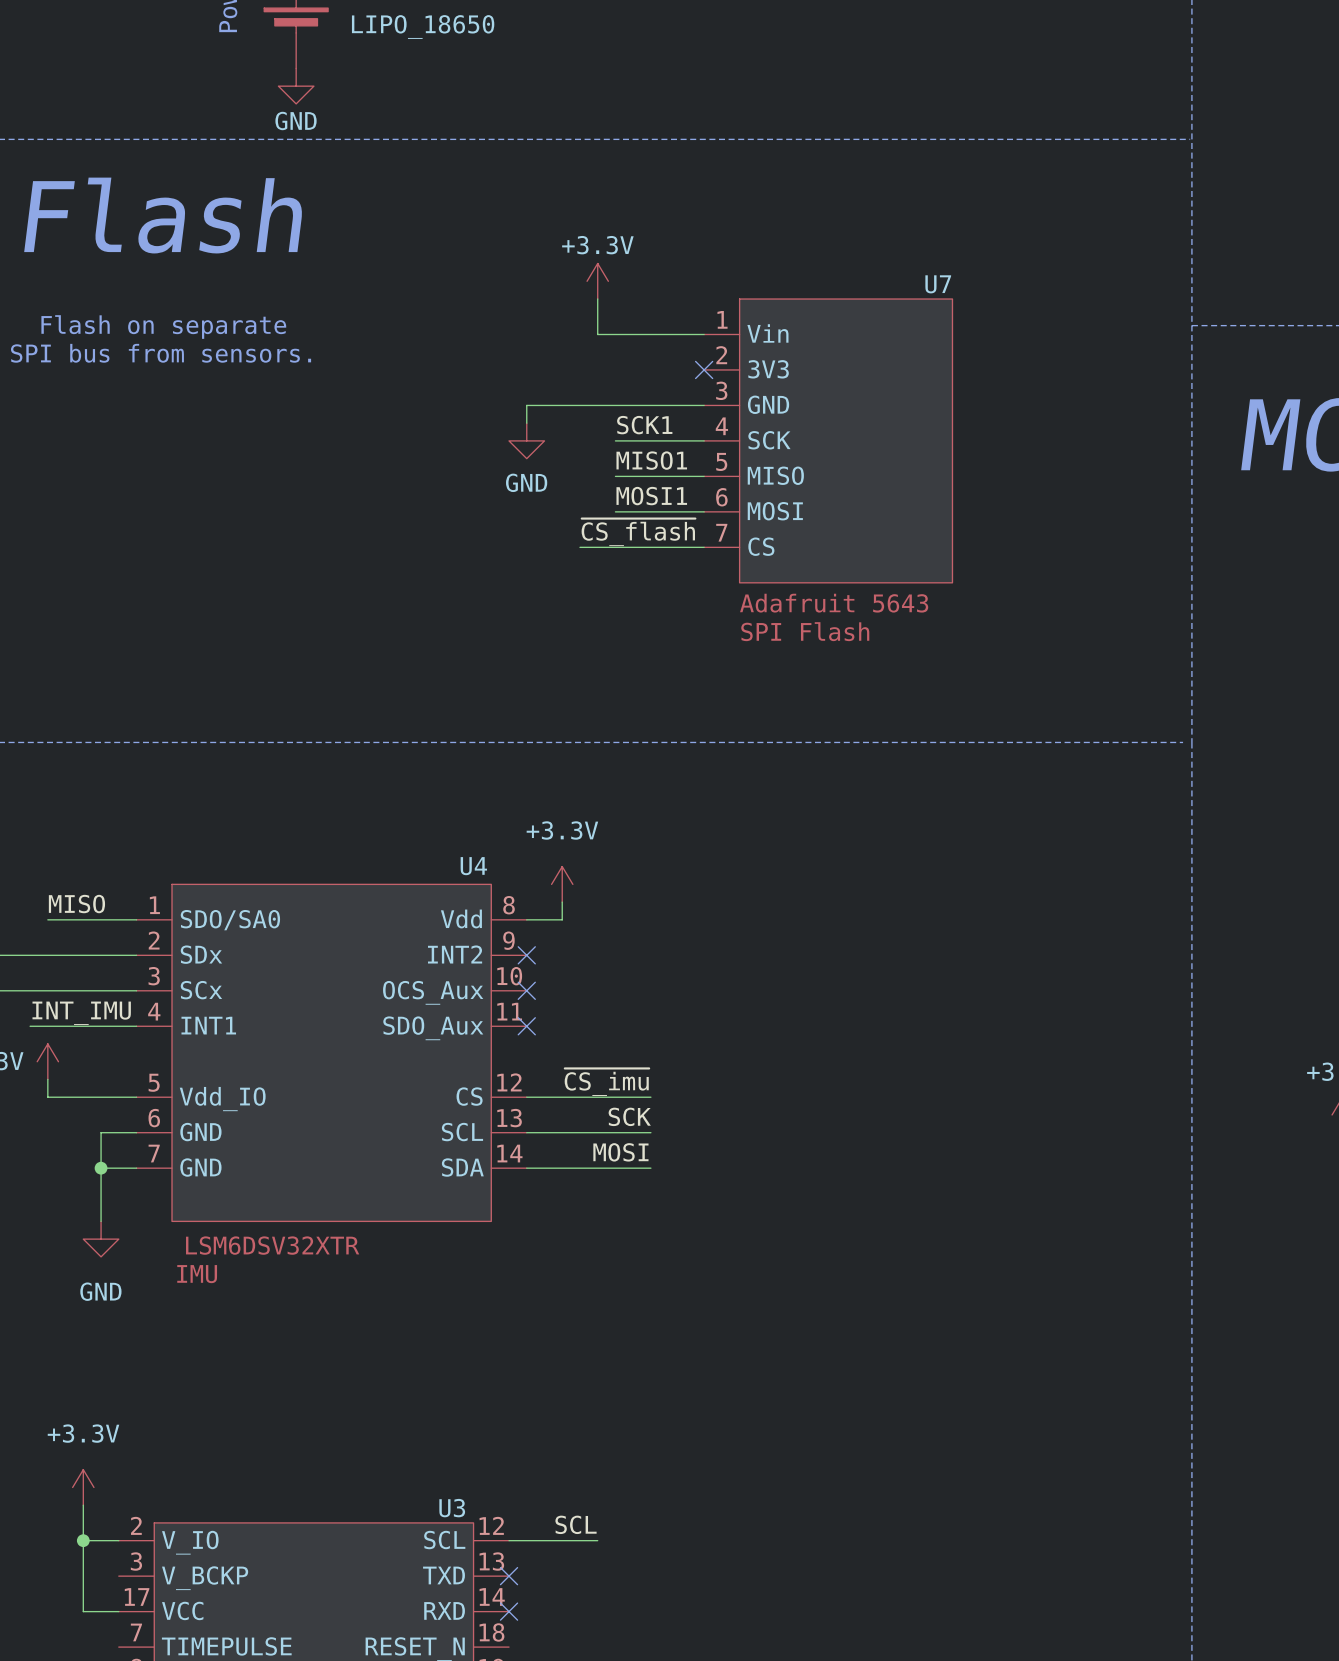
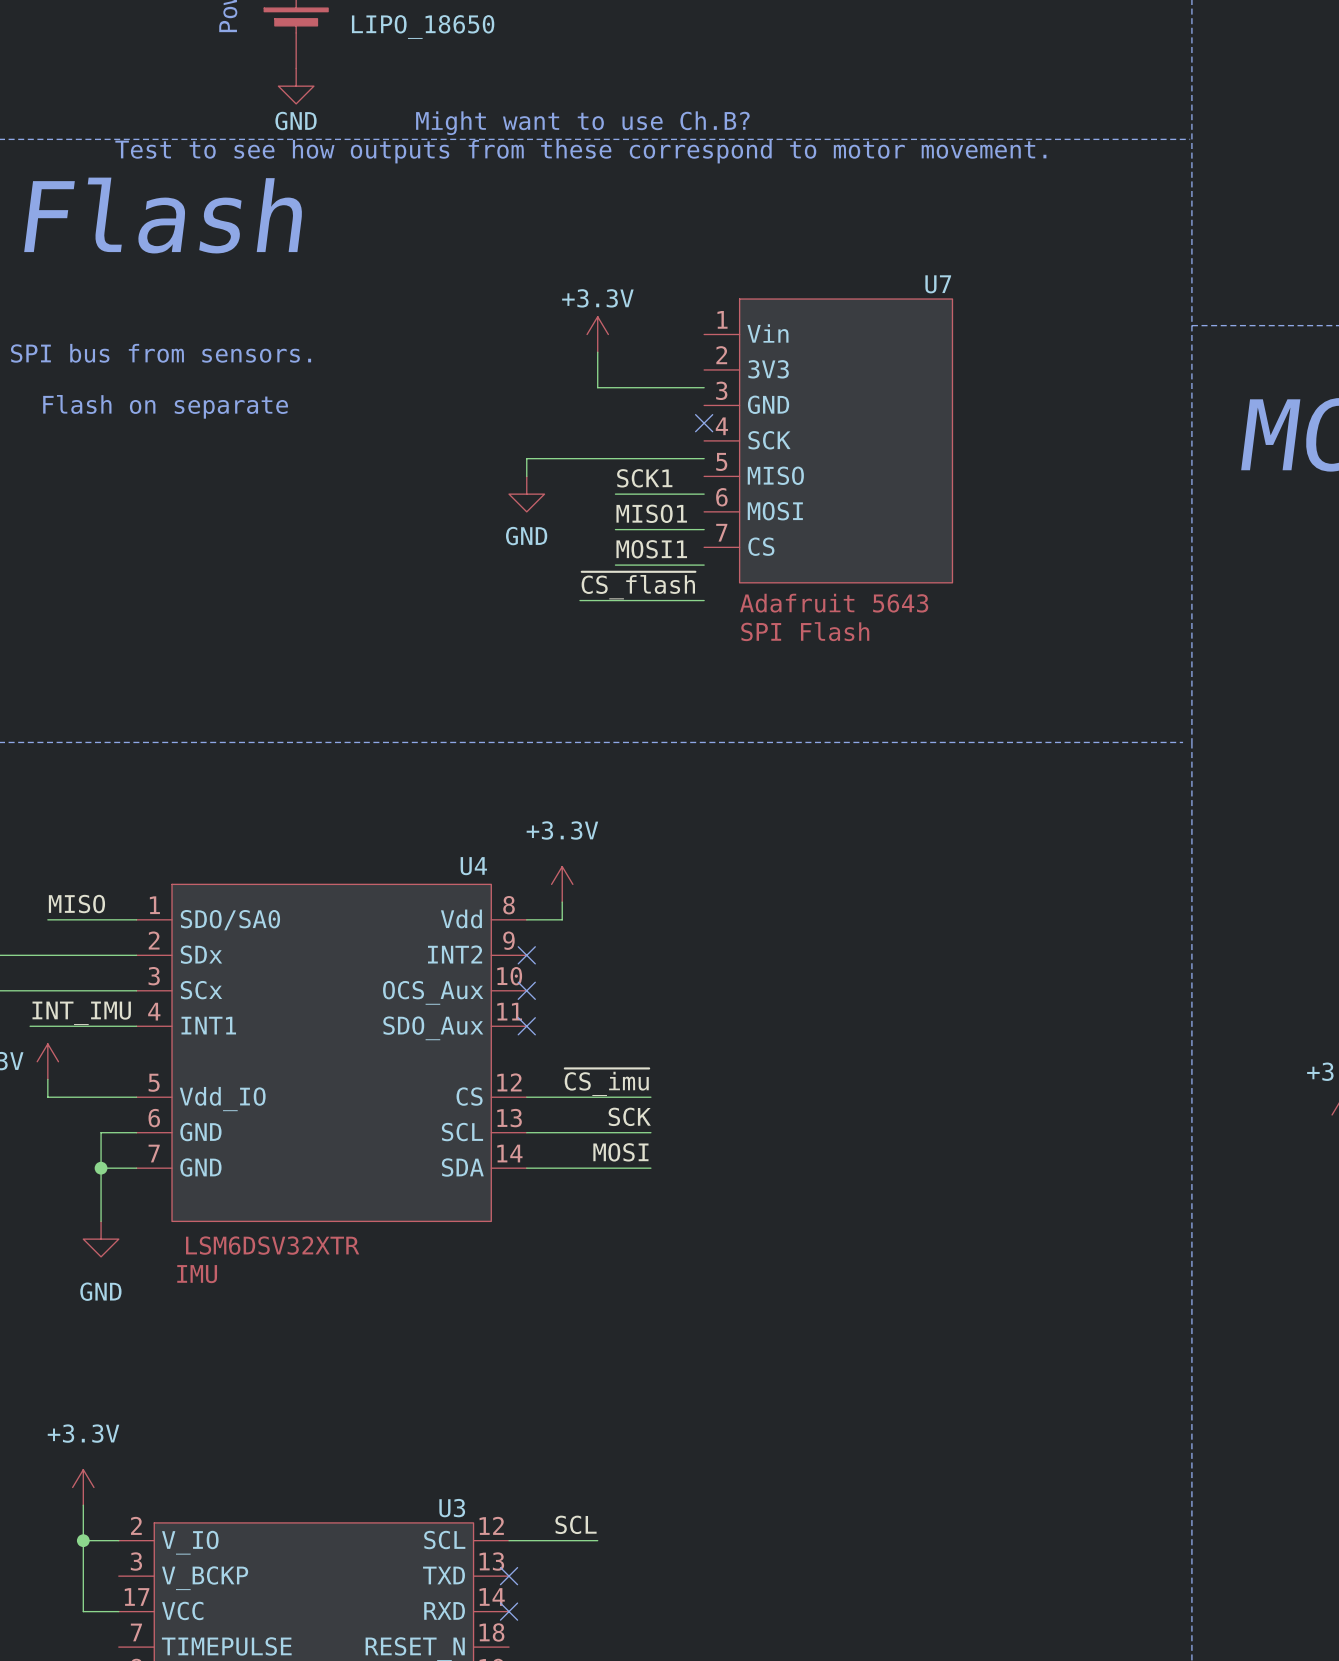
text: none -> Might want to use Ch.B? (582, 123)
text: none -> Test to see how outputs from these correspond to motor movement. (580, 151)
power symbol position: +3.3V (597, 281) -> +3.3V (597, 334)
wire: (597, 299) (597, 334) (704, 334) -> (597, 352) (597, 387) (704, 387)
text position: Flash on separate (163, 327) -> Flash on separate (165, 406)
no-connect mark position: (704, 369) -> (704, 423)
wire: (704, 405) (526, 405) (526, 423) -> (704, 458) (526, 458) (526, 476)
label position: SCK1 (644, 425) -> SCK1 (644, 478)
power symbol position: GND (526, 440) -> GND (526, 494)
wire: (615, 440) (704, 440) -> (615, 494) (704, 494)
label position: MISO1 (651, 460) -> MISO1 (651, 513)
wire: (615, 476) (704, 476) -> (615, 529) (704, 529)
label position: MOSI1 (651, 496) -> MOSI1 (651, 549)
wire: (615, 511) (704, 511) -> (615, 565) (704, 565)
label position: ~{CS_flash} (638, 532) -> ~{CS_flash} (638, 585)
wire: (579, 547) (704, 547) -> (579, 600) (704, 600)

